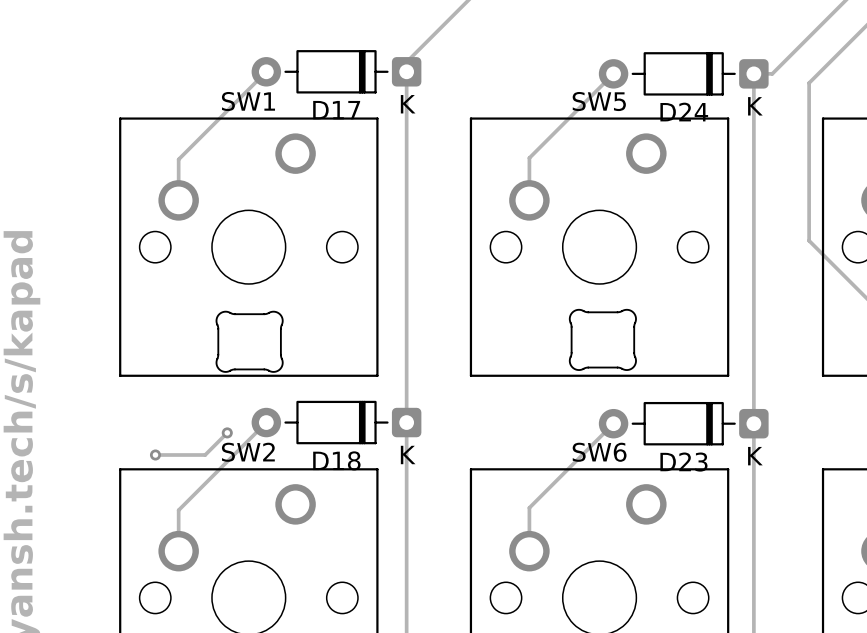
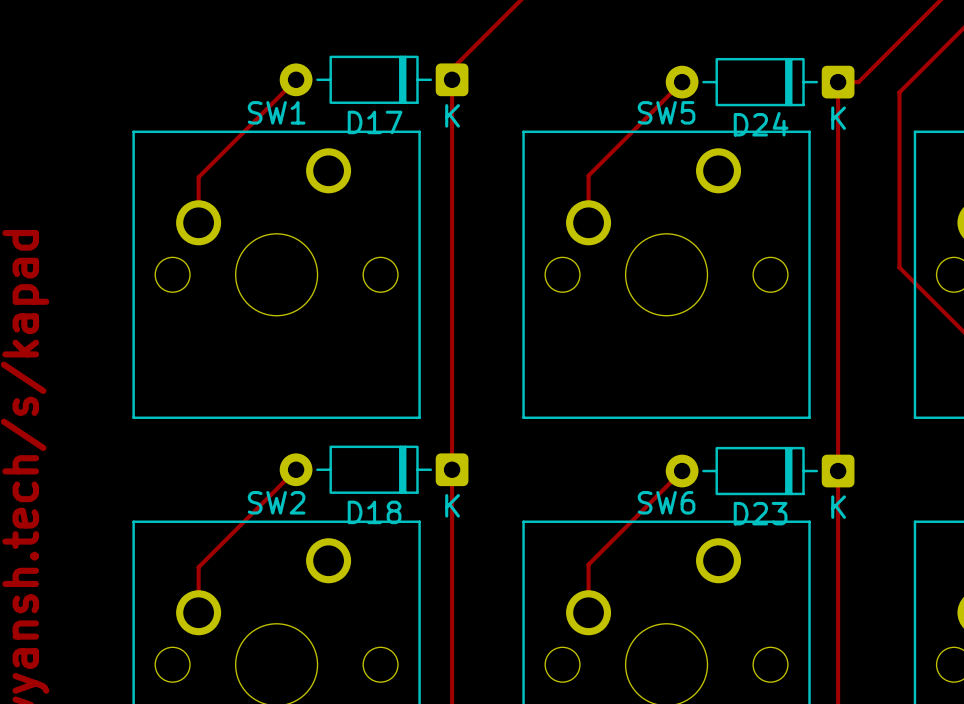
part: (602, 339) -> none
part: (249, 341) -> none
track: (227, 432) (205, 455) (155, 455) -> none
via: (227, 432) -> none
via: (155, 455) -> none

